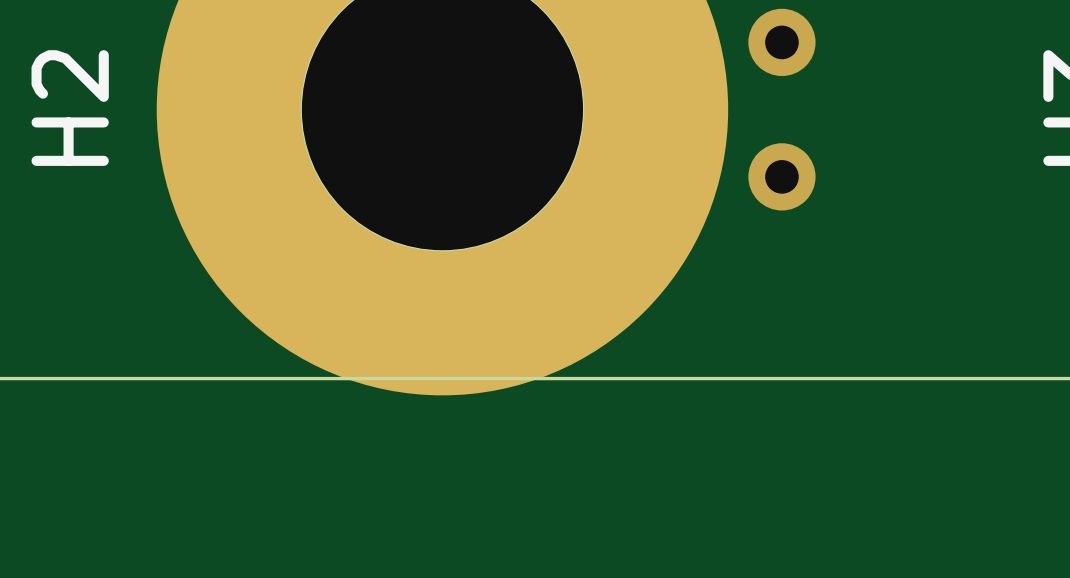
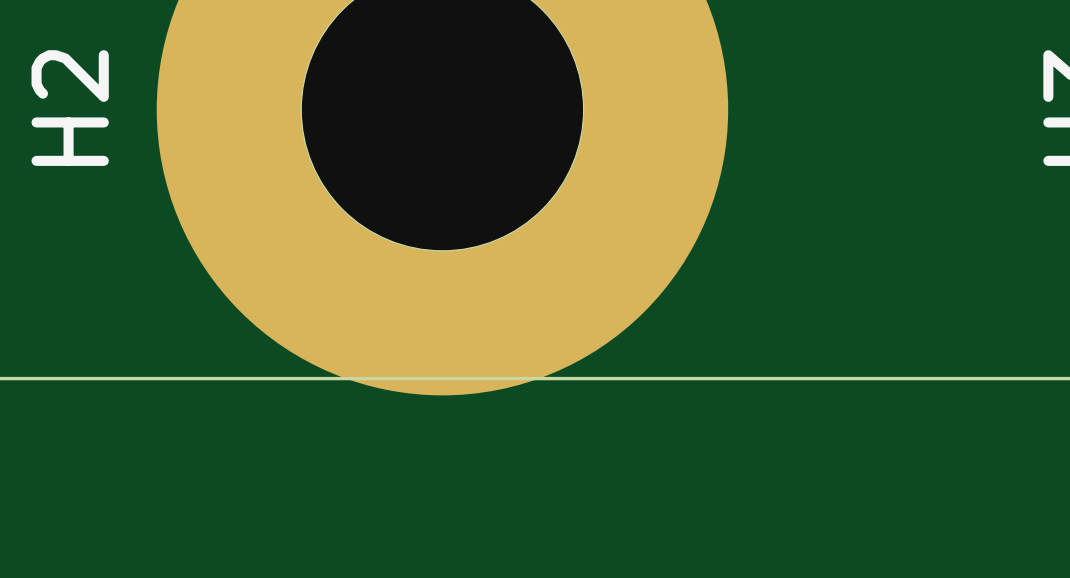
via: (781, 42) -> none
via: (781, 176) -> none

